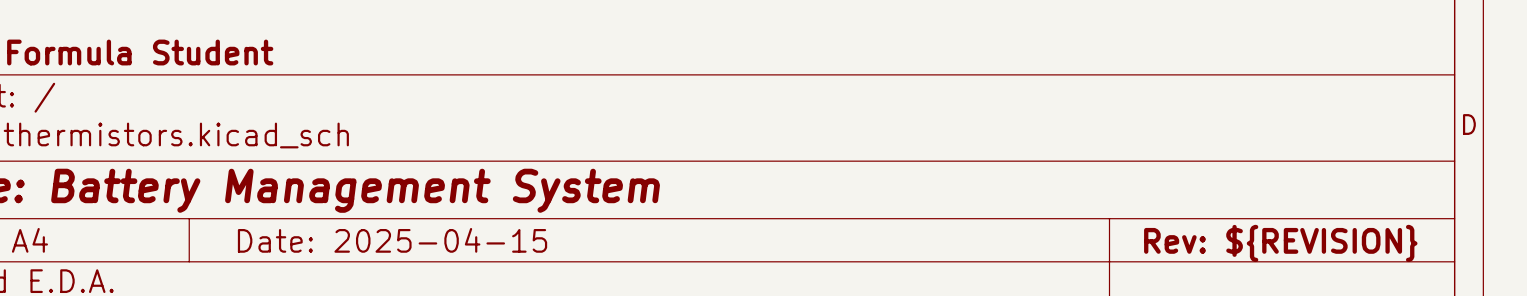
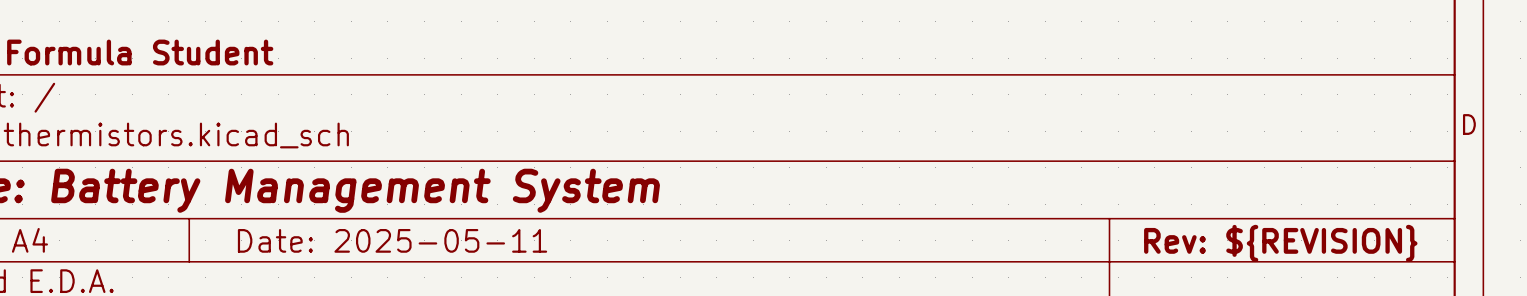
title block: Date: 2025-04-15 (392, 240) -> Date: 2025-05-11 (392, 240)

